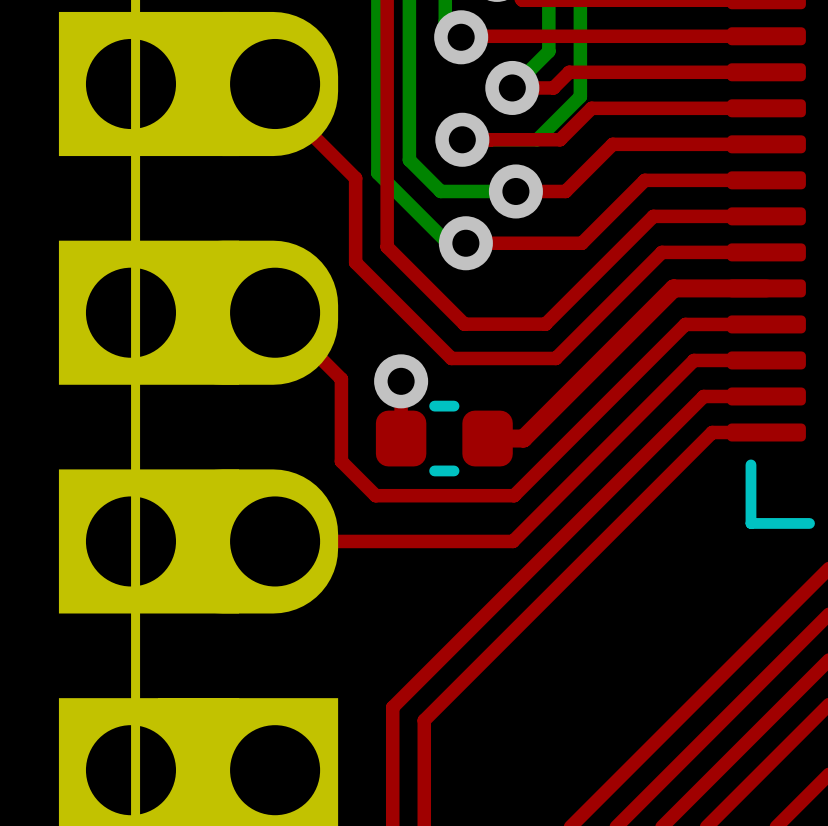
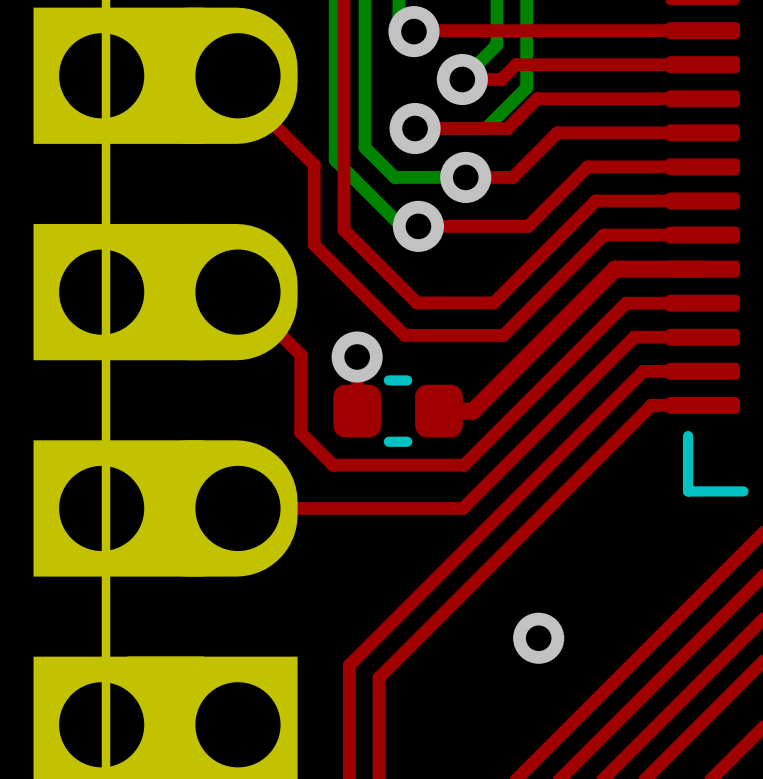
via: none -> (538, 638)

